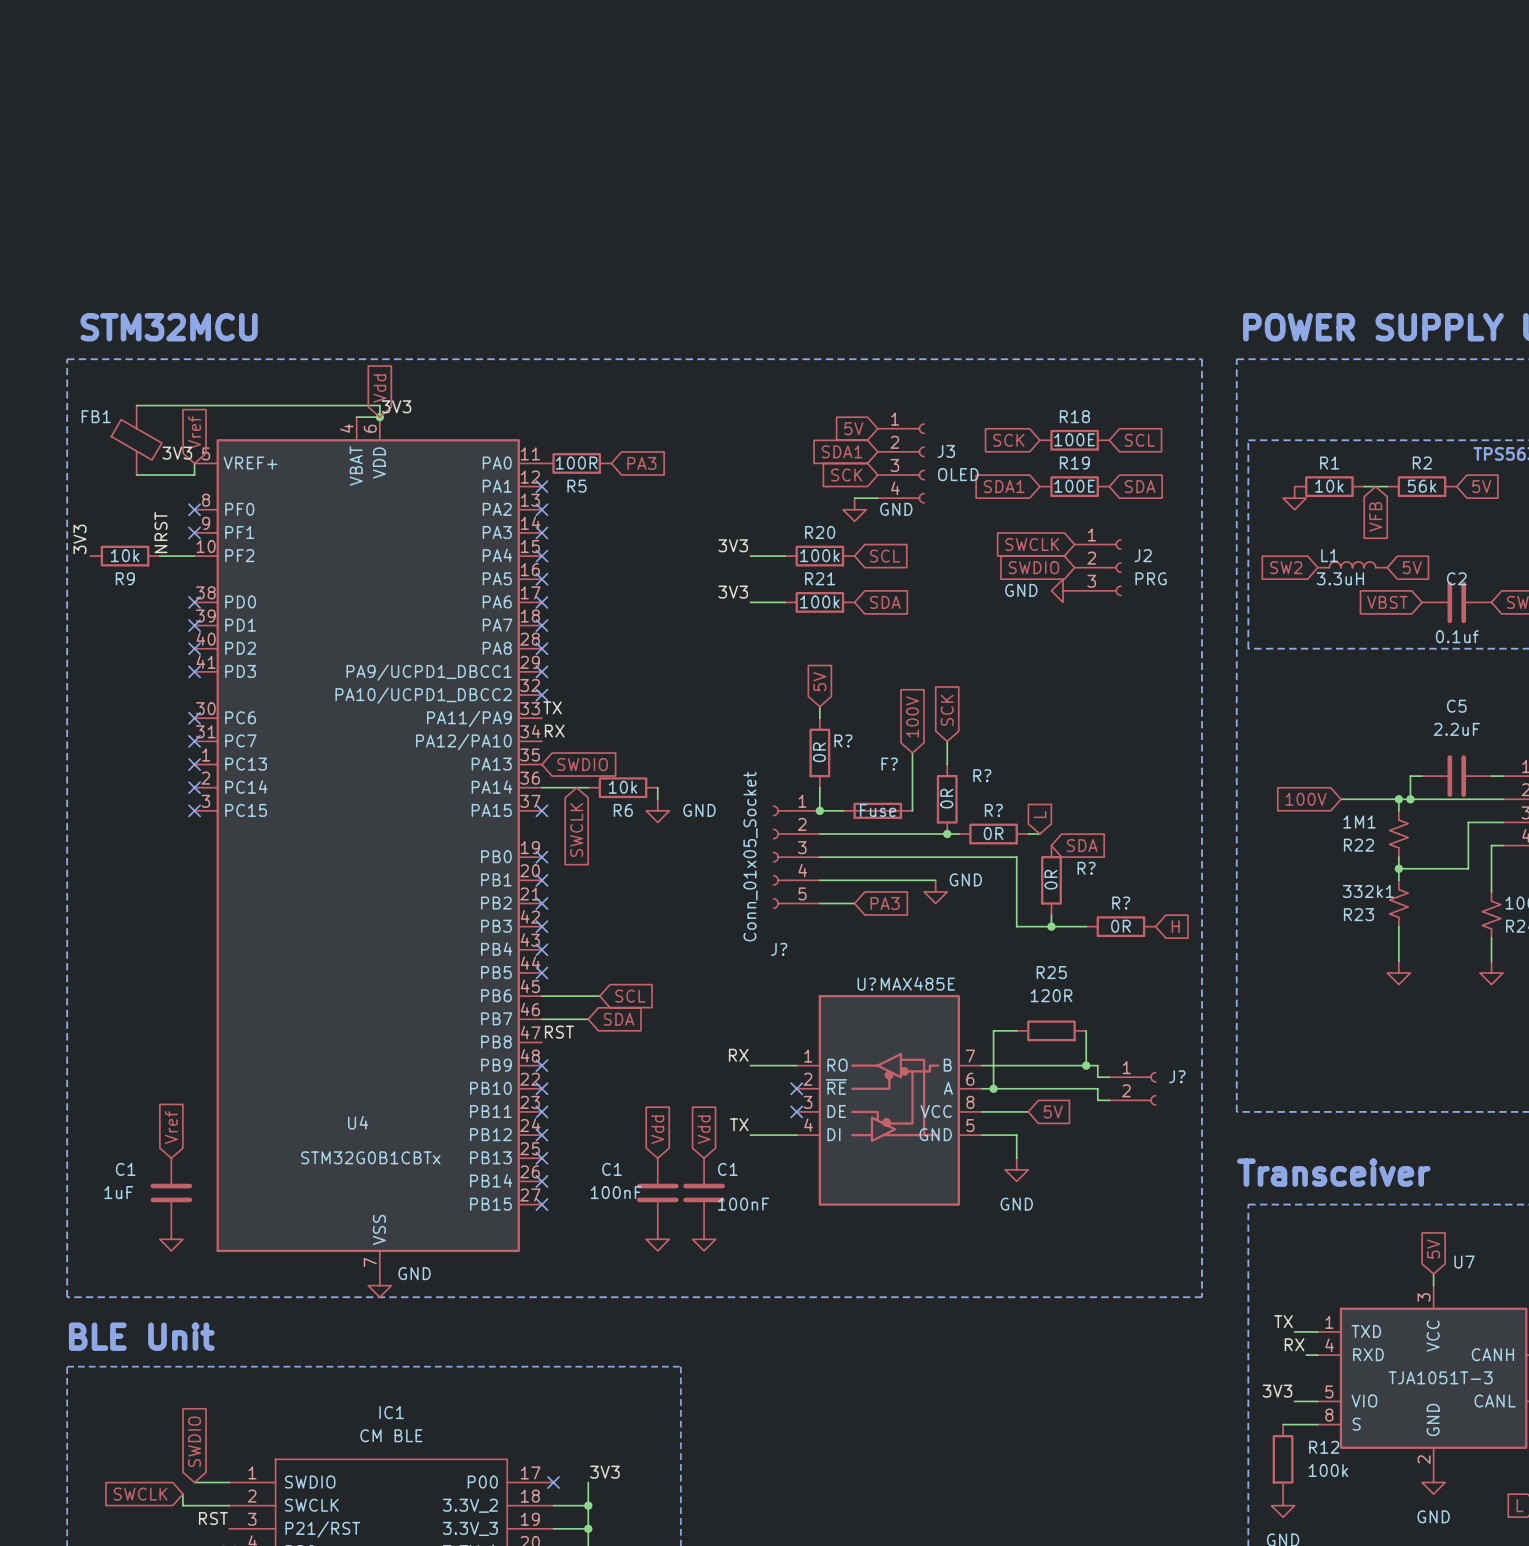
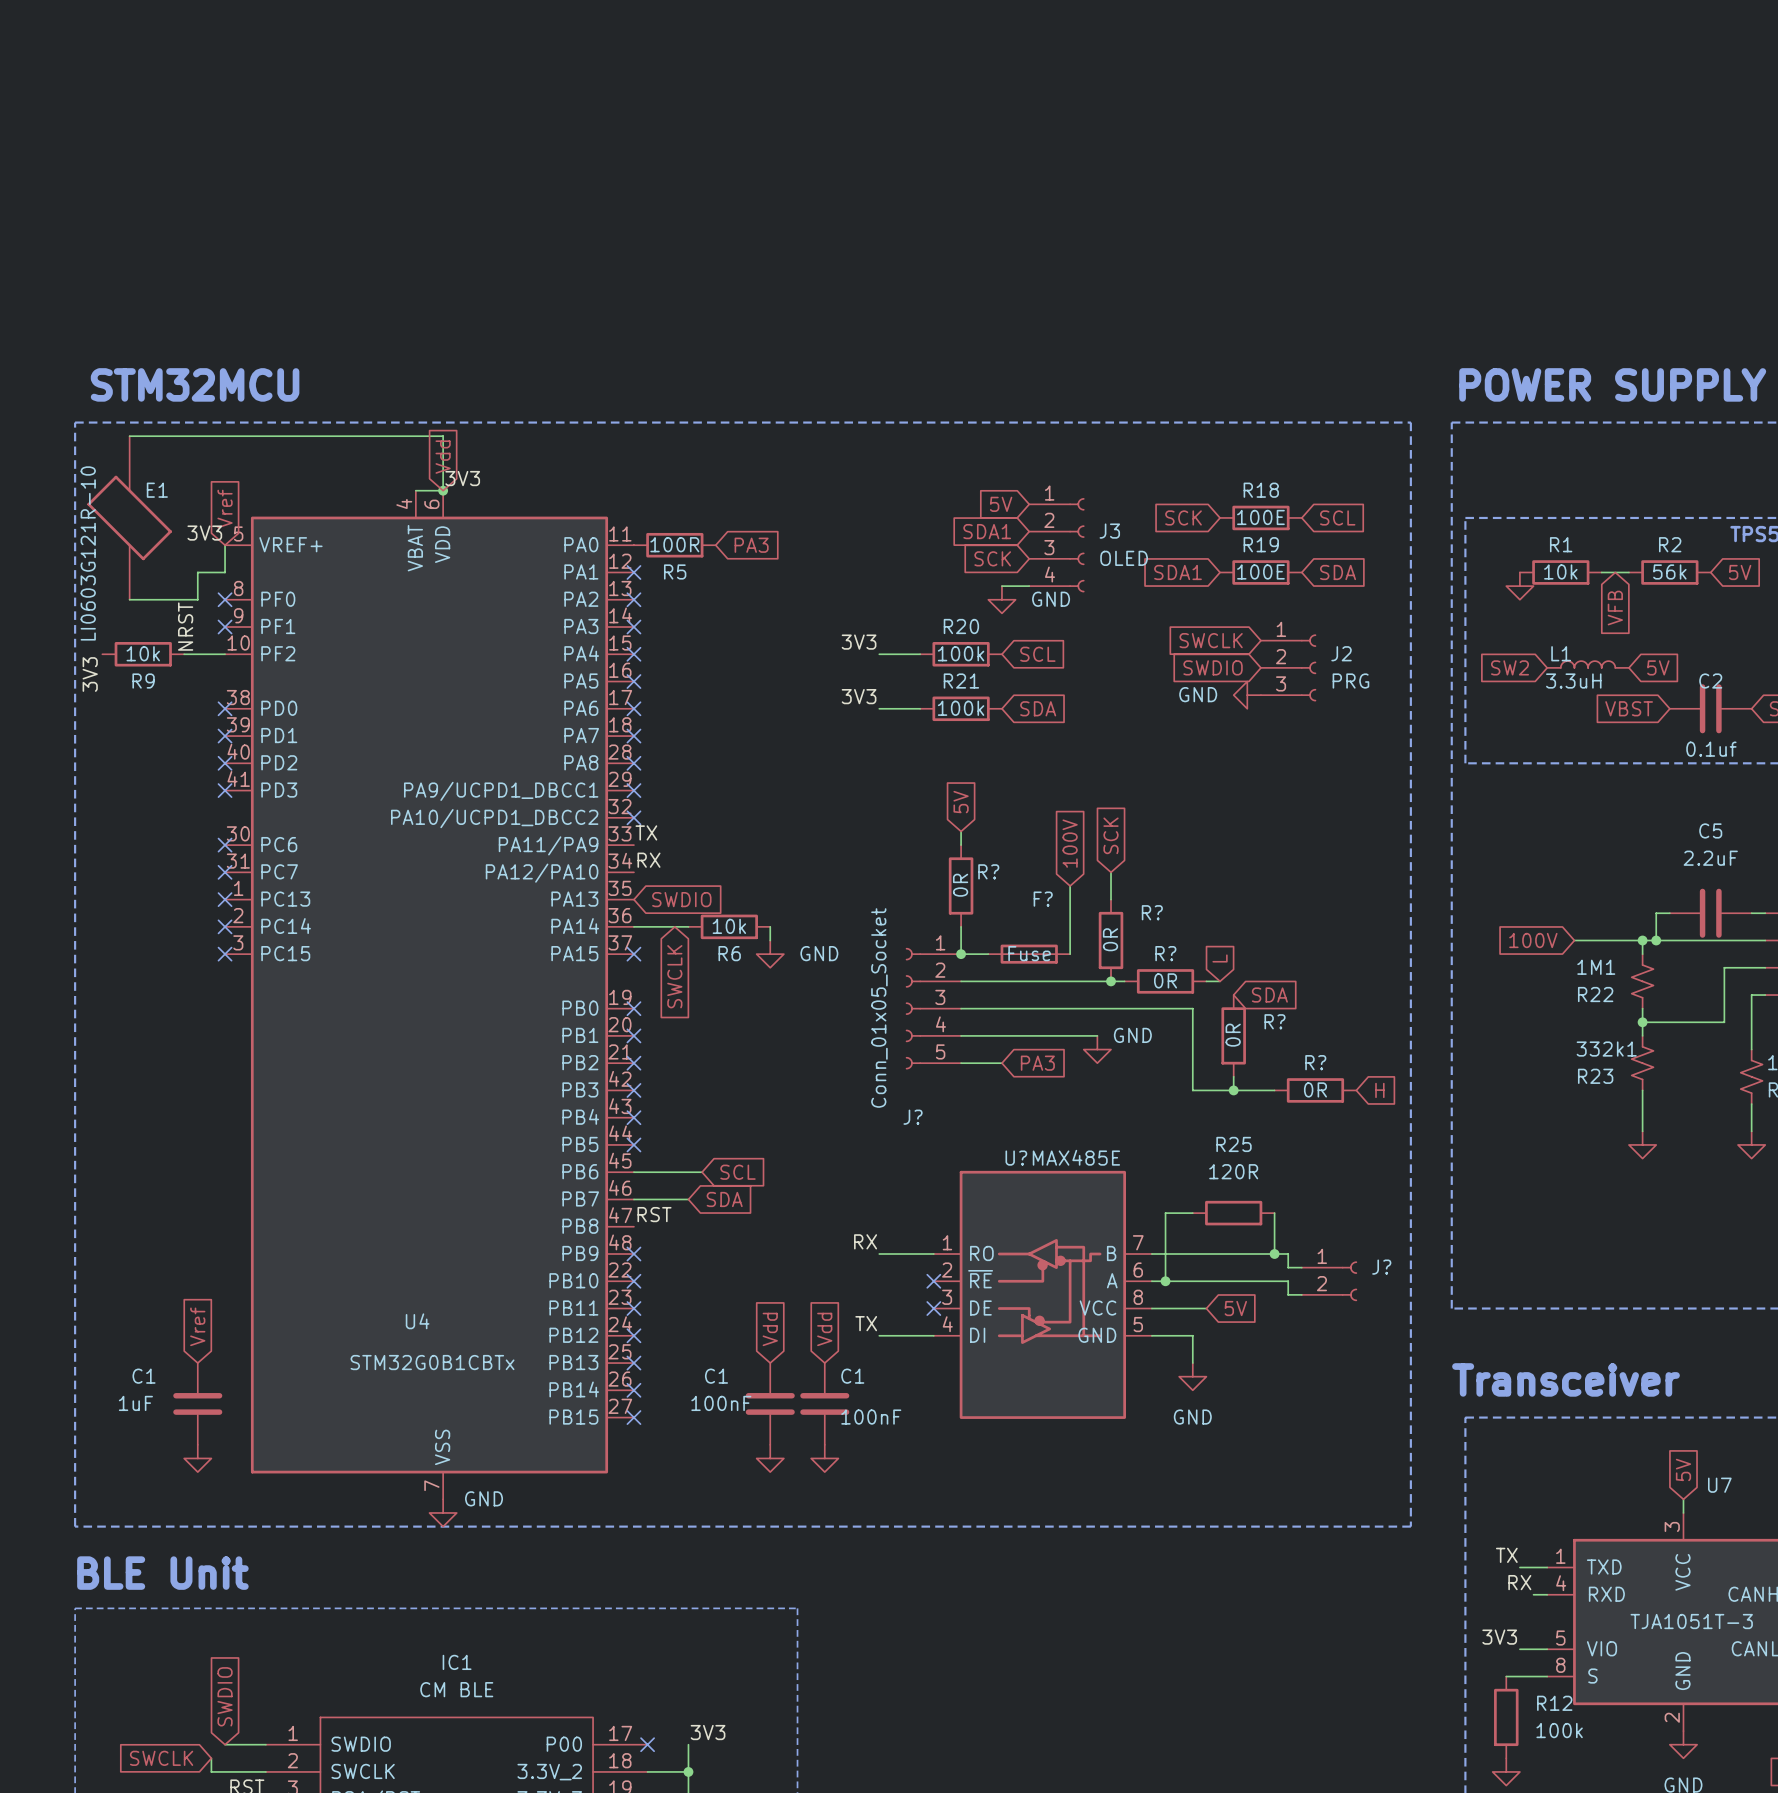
wire: (136, 405) (379, 405) -> (129, 436) (443, 436) (443, 477)
E1: none -> LI0603G121R-10 (129, 517)
FB1: (136, 440) -> none
wire: (136, 475) (194, 475) -> (129, 599) (197, 599) (197, 572) (225, 572) (225, 558)
label position: 3V3 (79, 539) -> 3V3 (90, 674)

